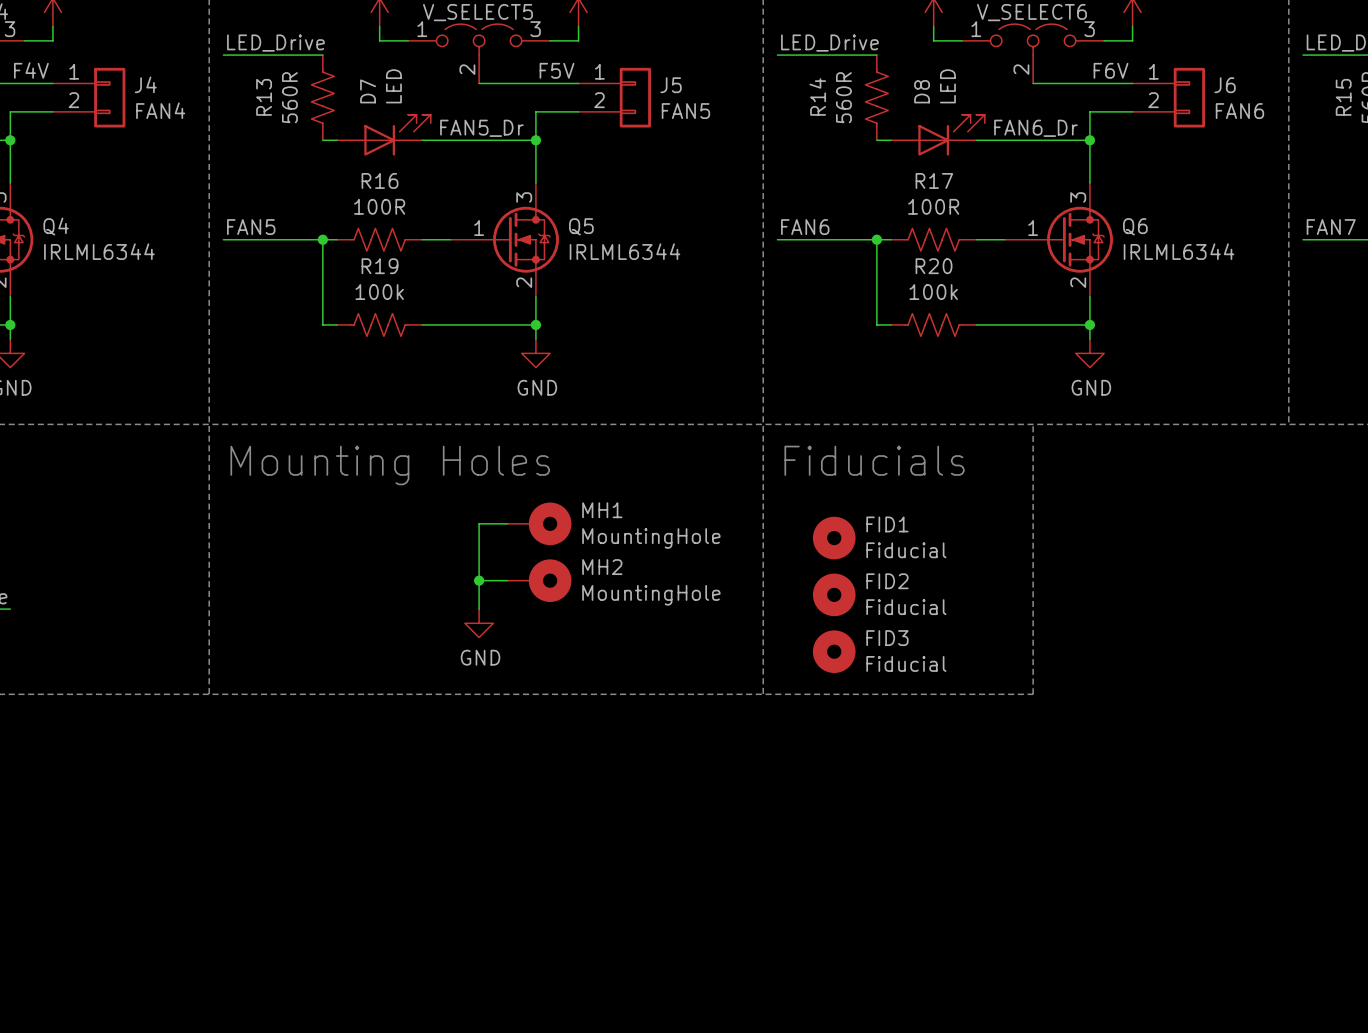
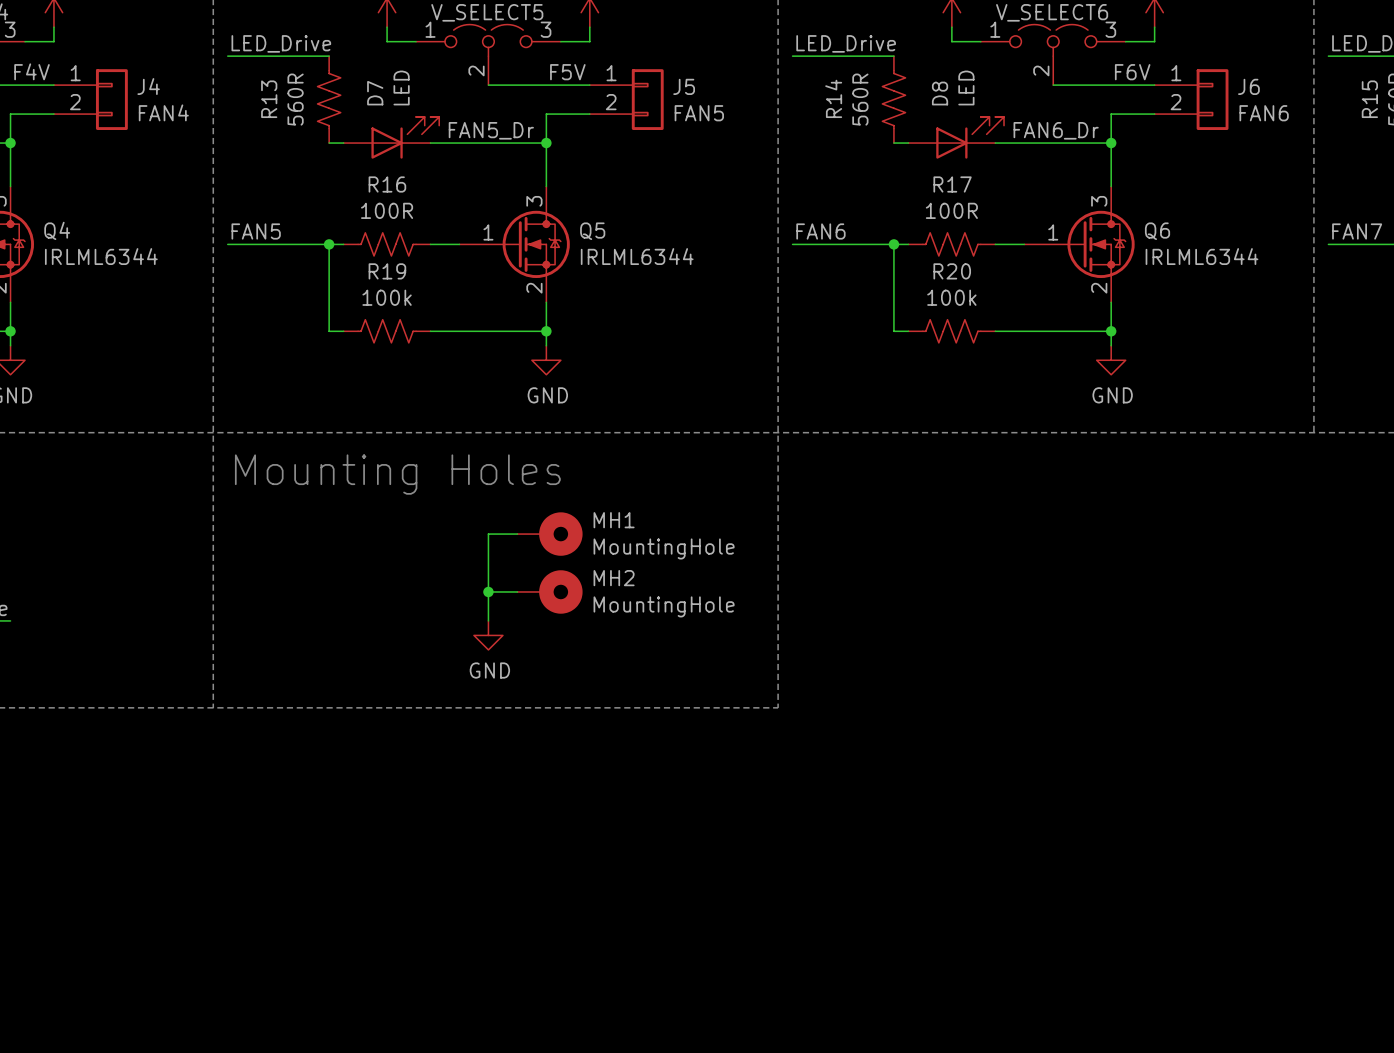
line: (1033, 424) (1033, 694) (763, 694) -> none
text: Fiducials (874, 460) -> none
FID1: Fiducial (834, 538) -> none
FID2: Fiducial (834, 594) -> none
FID3: Fiducial (834, 651) -> none

